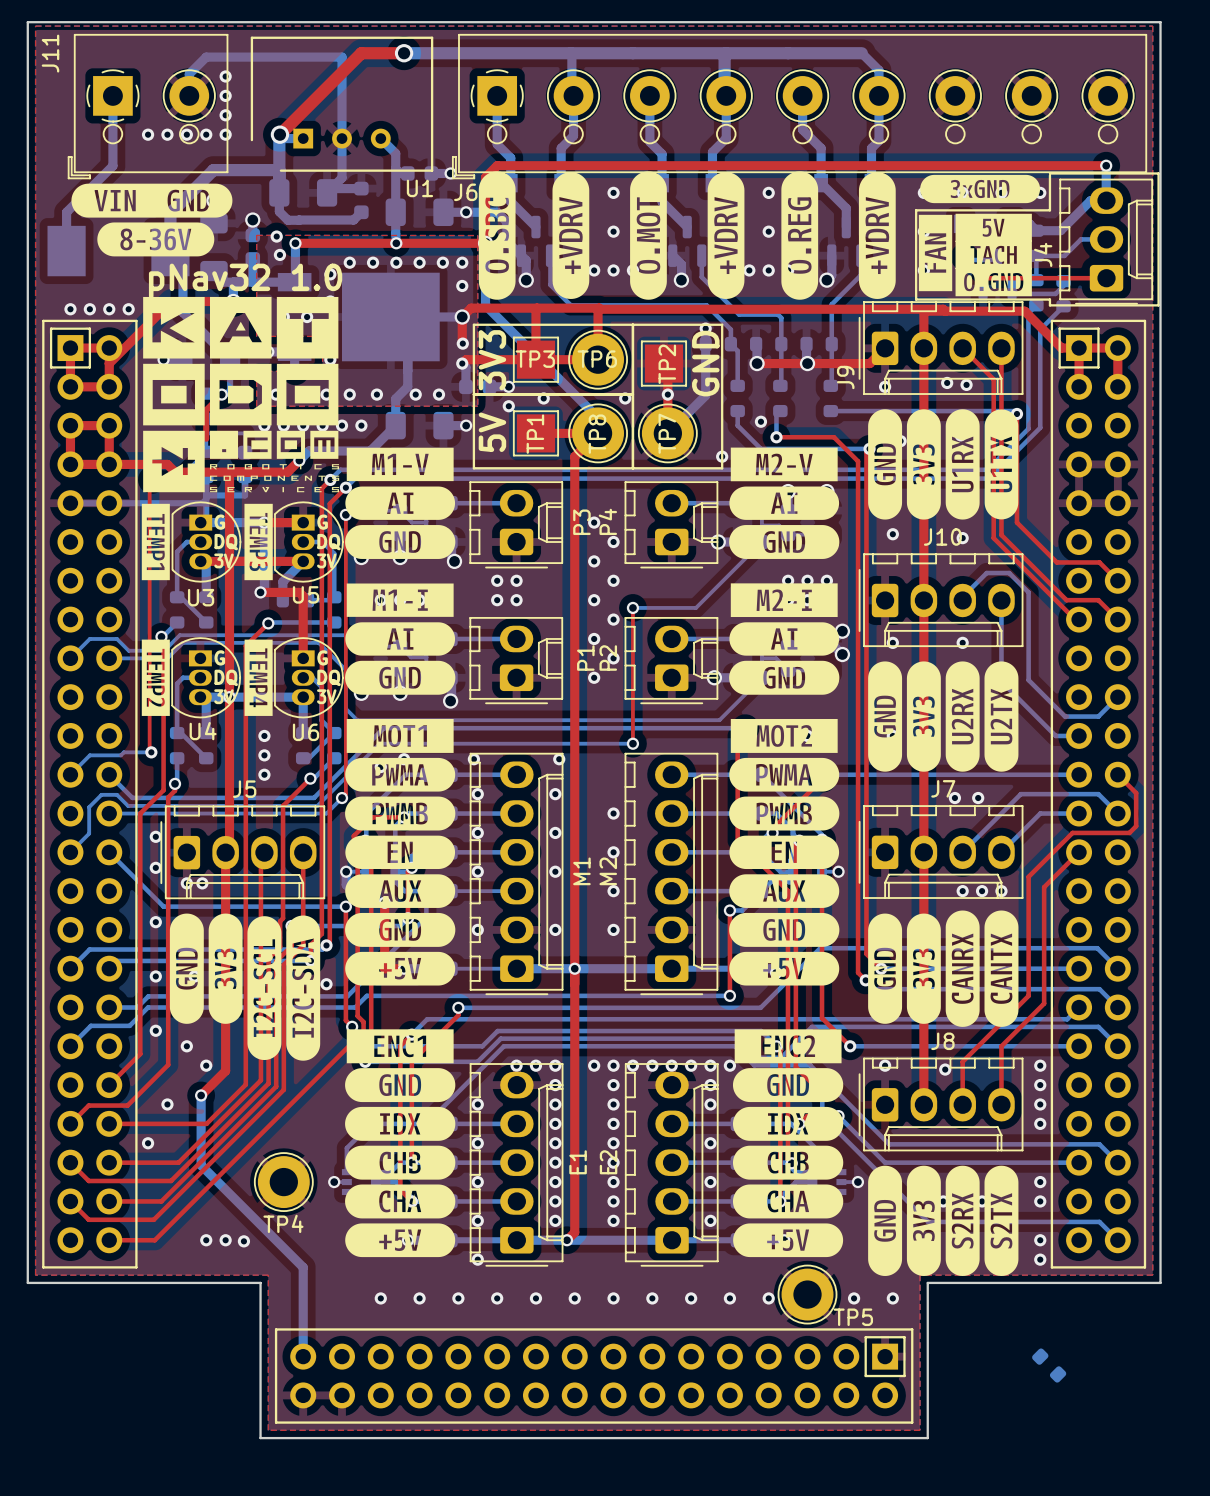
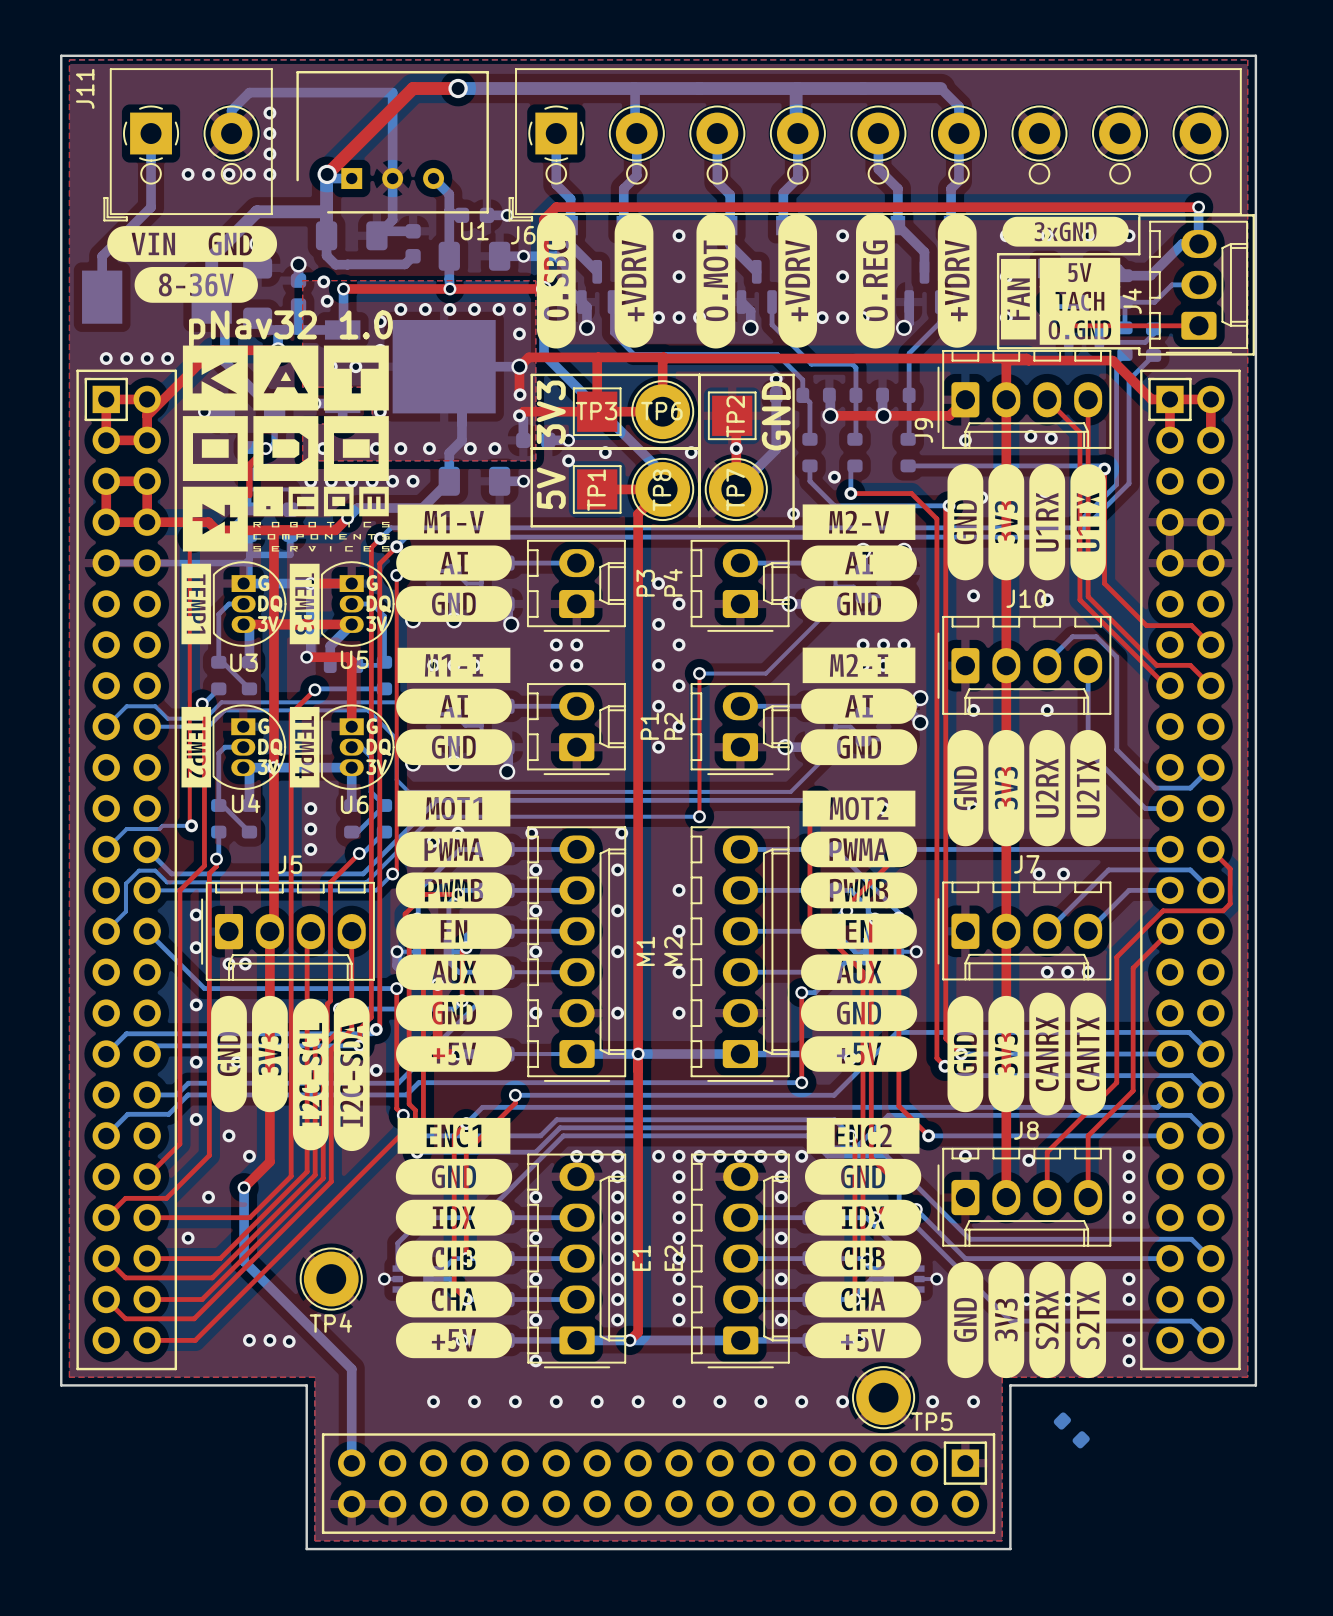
part position: (1049, 1365) -> (1071, 1430)

